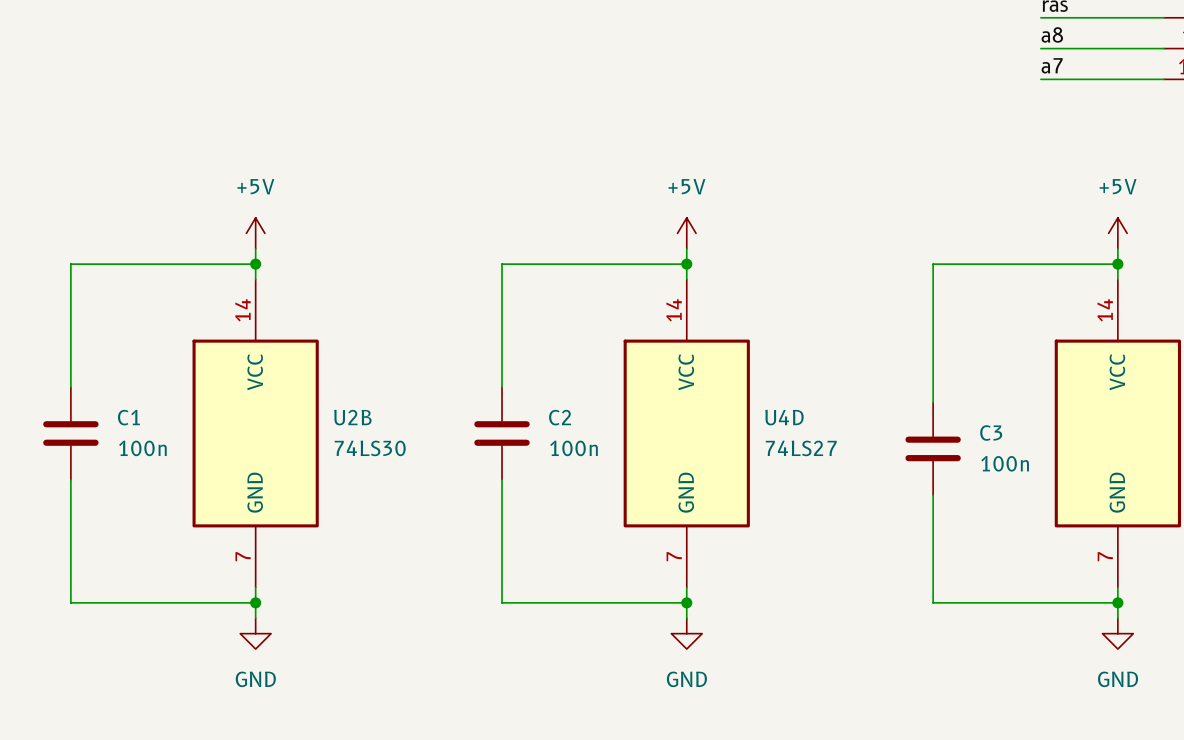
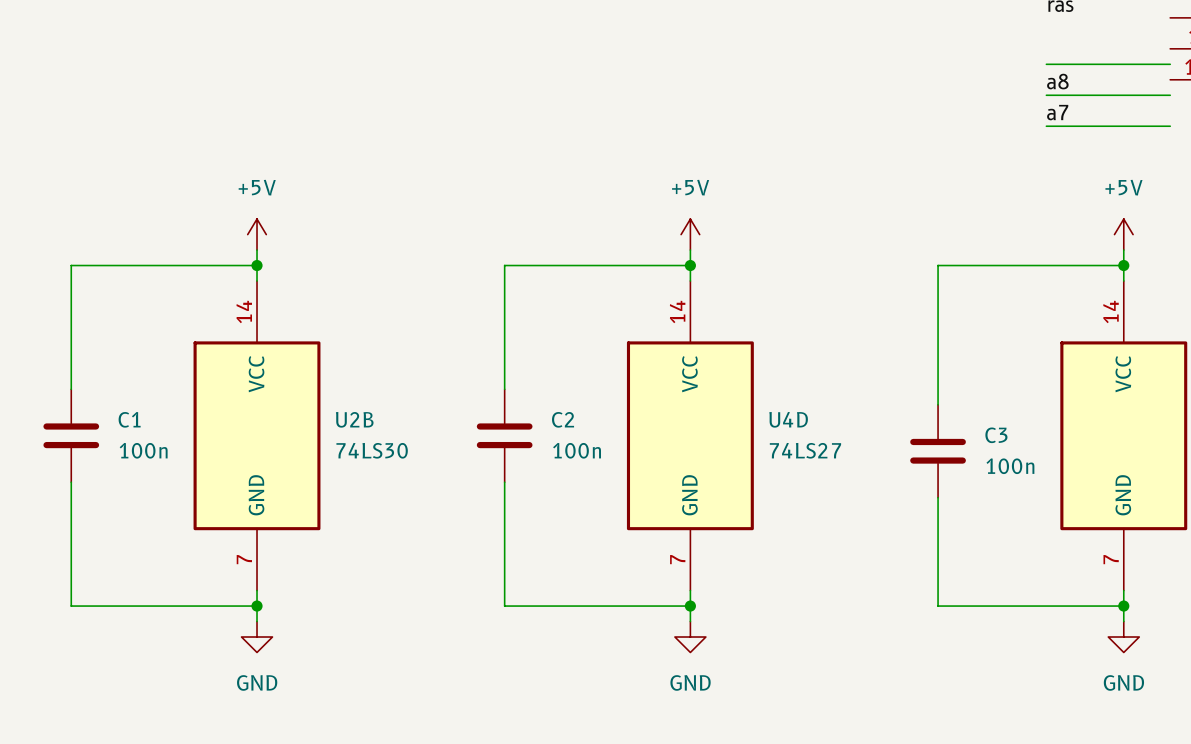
wire: (1040, 17) (1164, 17) -> (1046, 64) (1170, 64)
label position: a8 (1052, 34) -> a8 (1057, 81)
wire: (1040, 48) (1164, 48) -> (1046, 95) (1170, 95)
label position: a7 (1052, 65) -> a7 (1057, 112)
wire: (1040, 79) (1164, 79) -> (1046, 126) (1170, 126)

